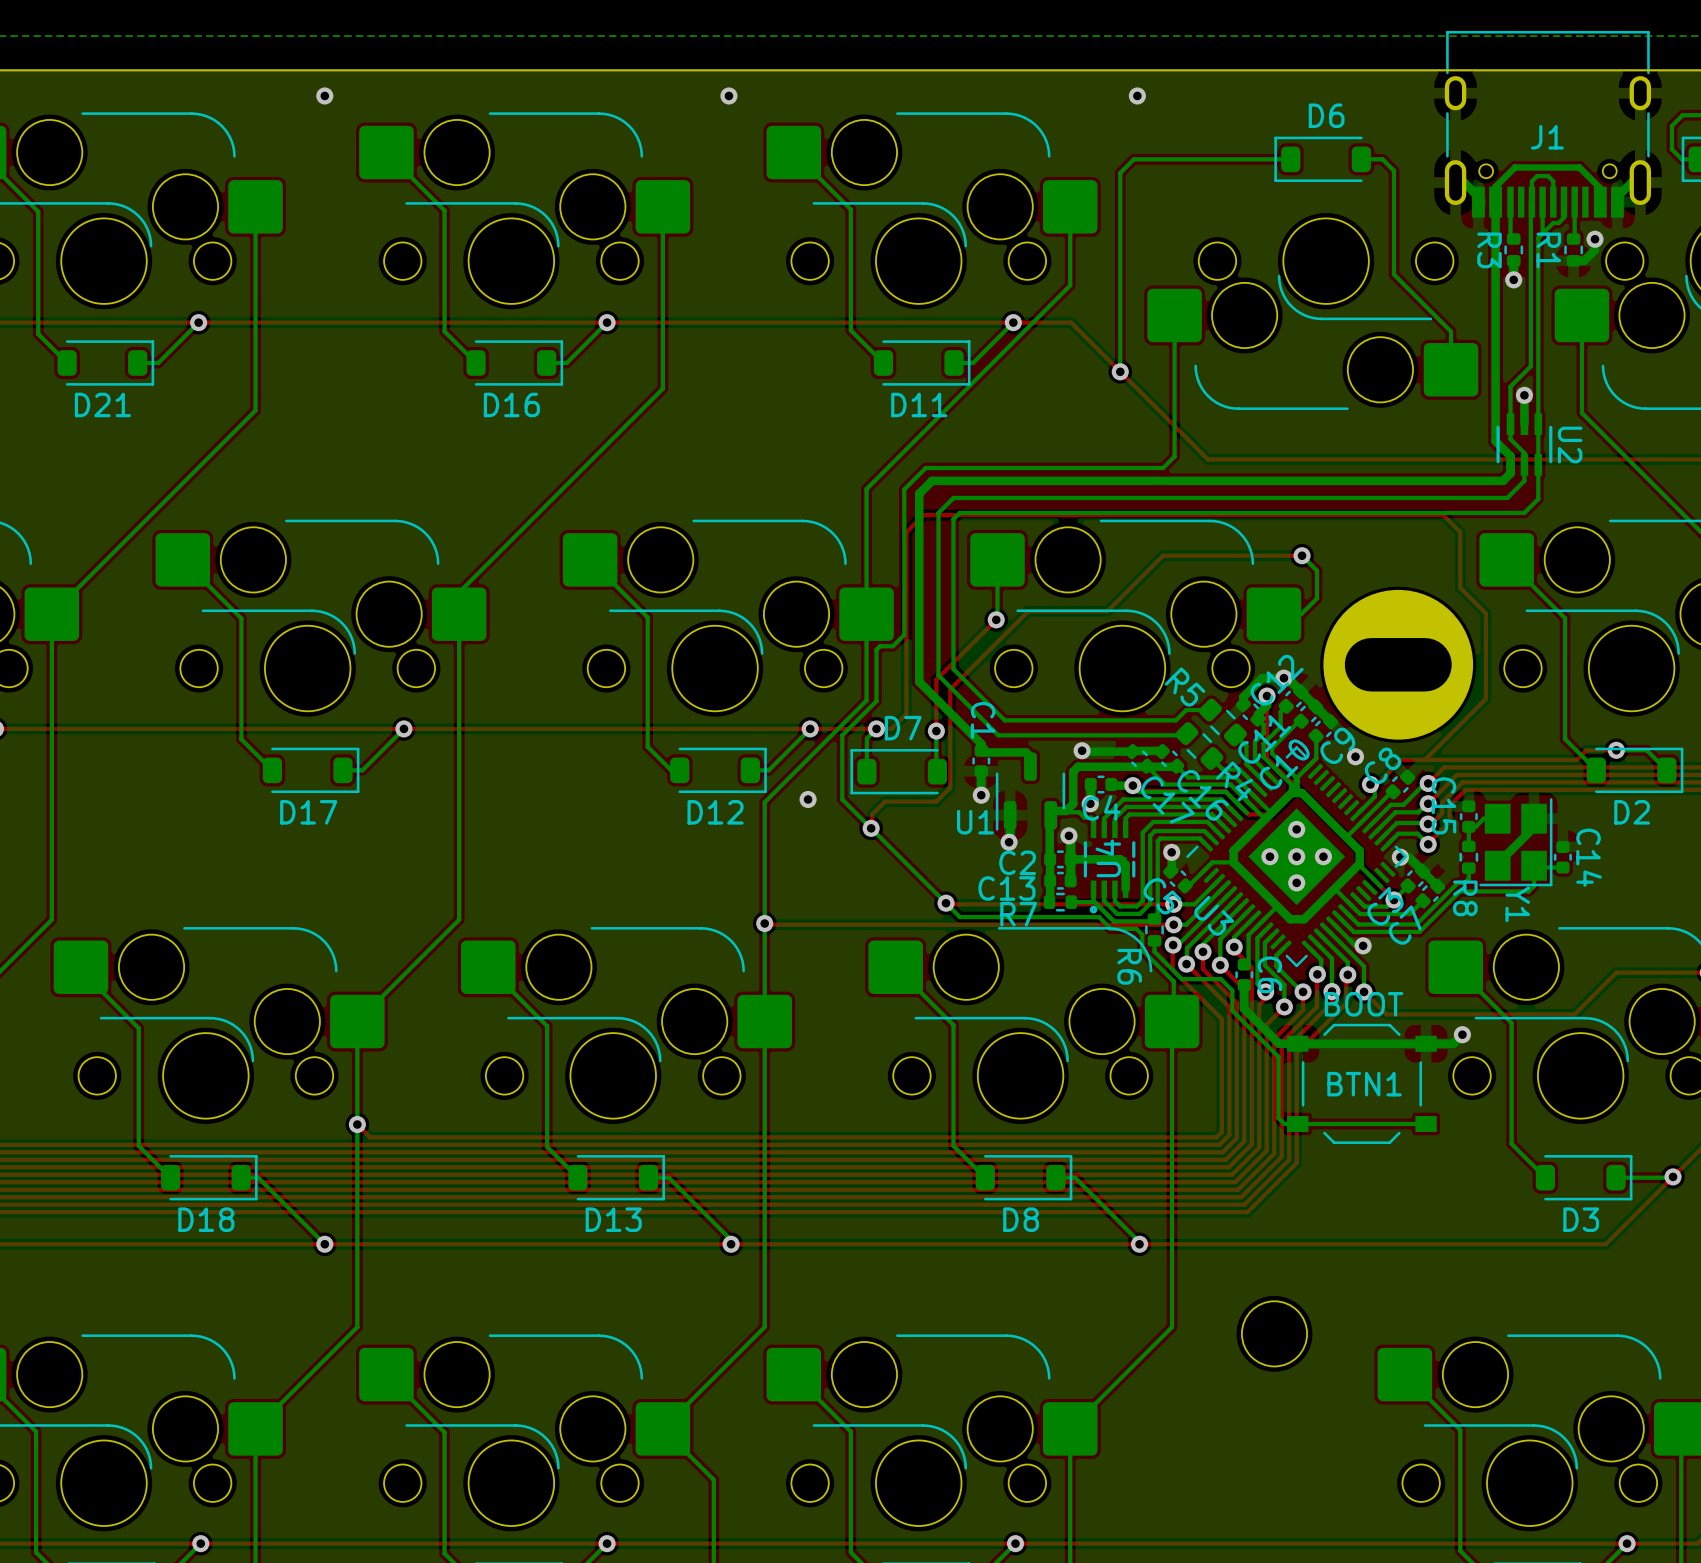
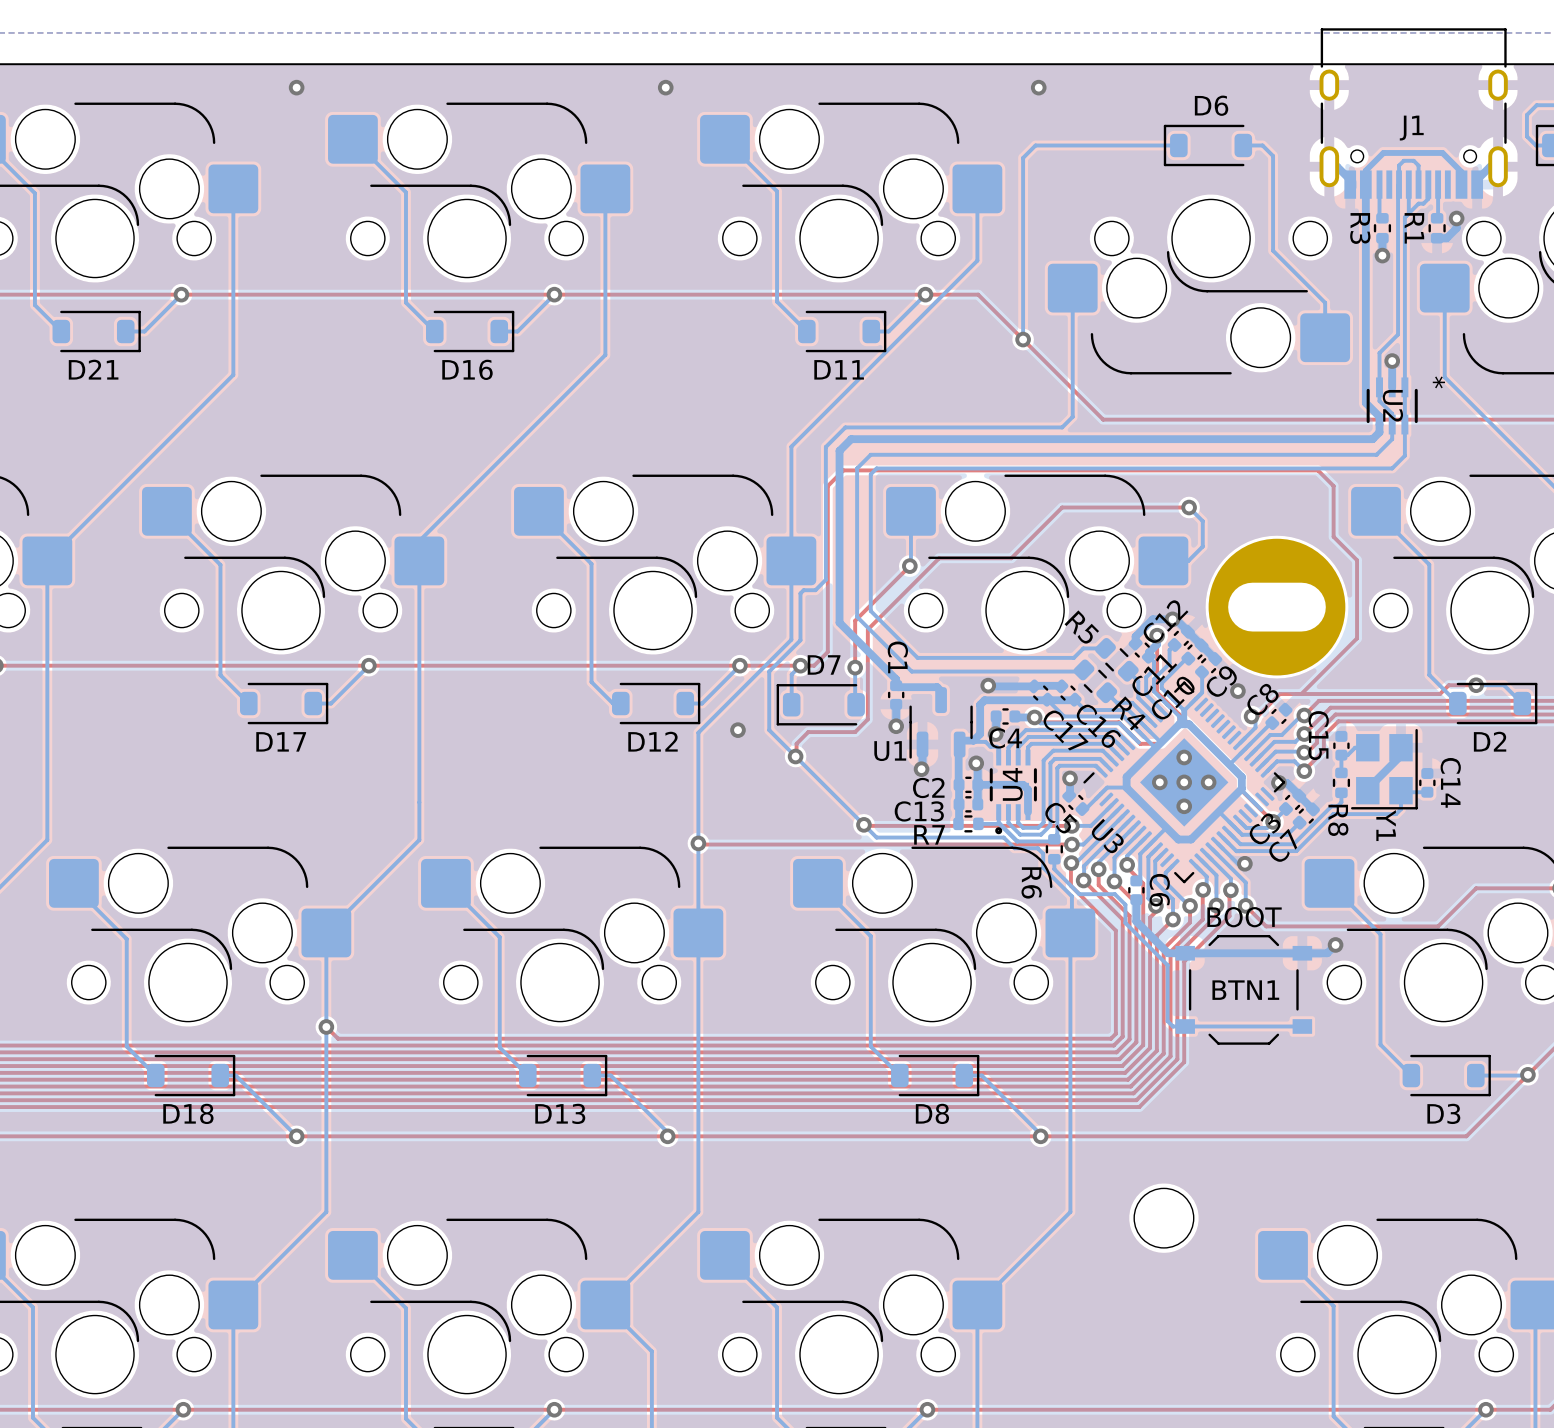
U2 text: none -> * (1438, 382)
U2 name position: U2 (1570, 445) -> U2 (1392, 405)

